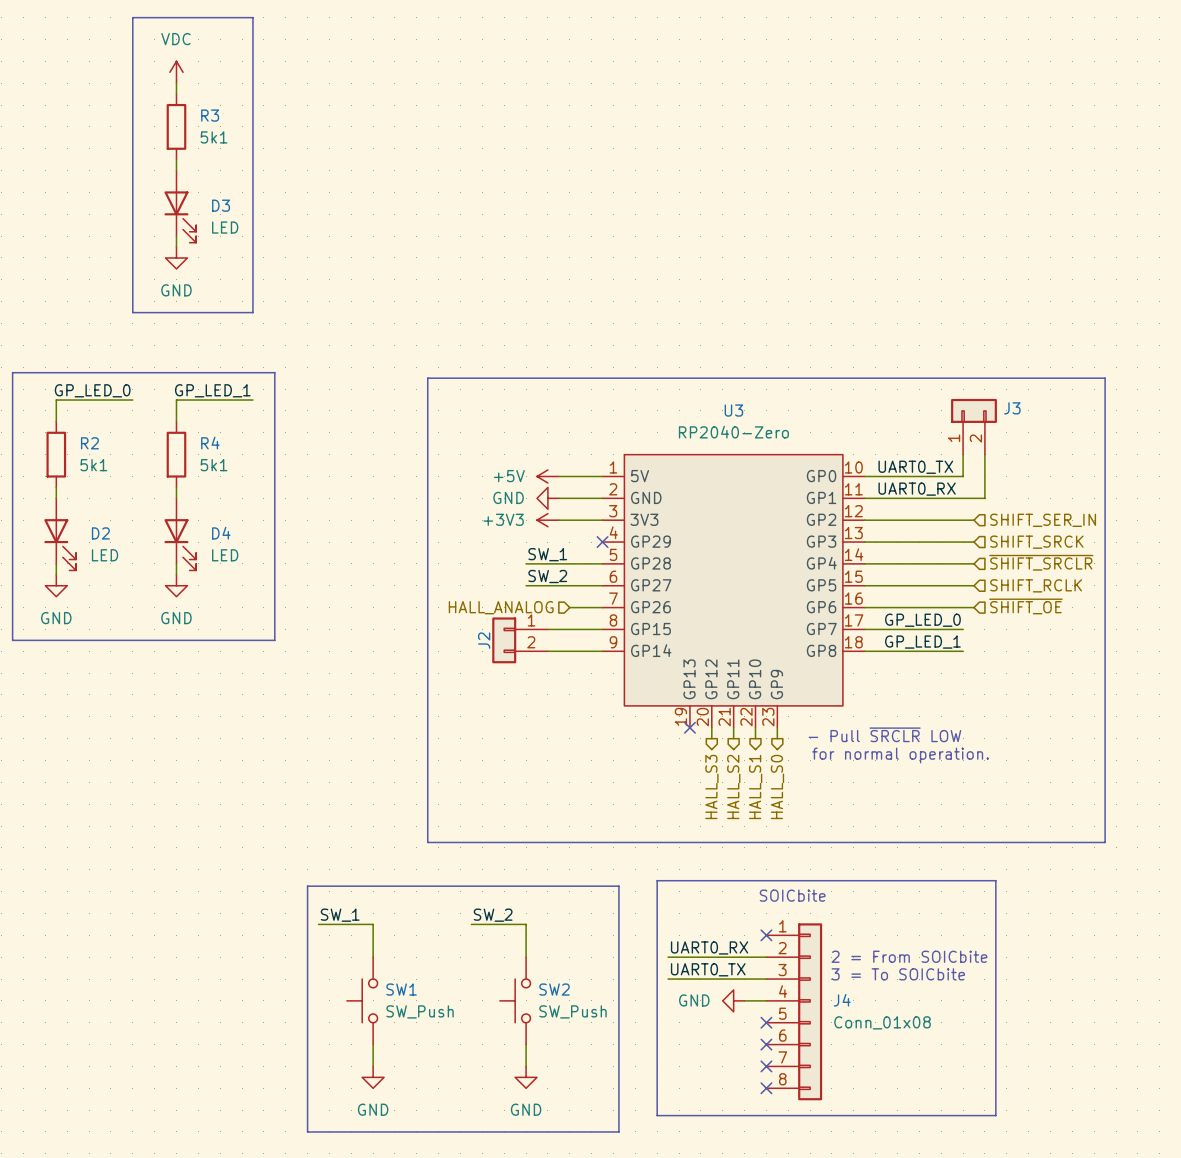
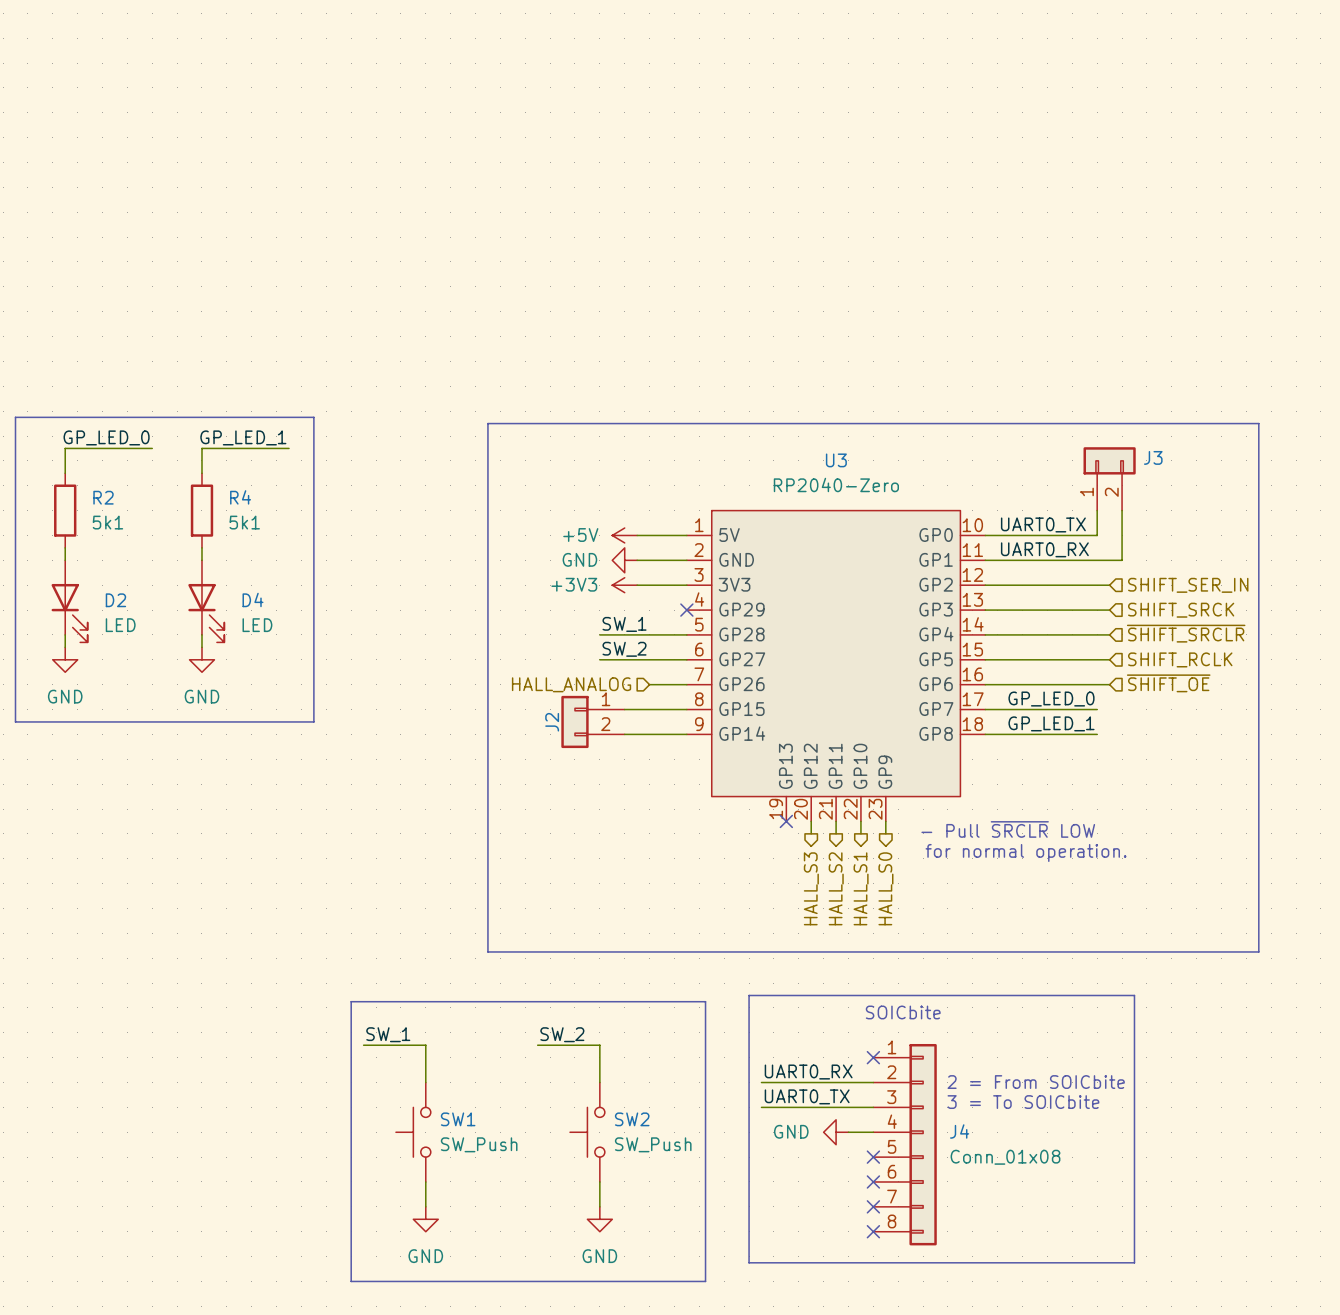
line: (132, 17) (252, 17) (252, 312) (132, 312) (132, 17) -> none
power symbol: VDC (176, 72) -> none
wire: (176, 83) (176, 94) -> none
R3: 5k1 (176, 126) -> none
wire: (176, 159) (176, 170) -> none
D3: LED (180, 206) -> none
wire: (176, 236) (176, 247) -> none
power symbol: GND (176, 257) -> none

